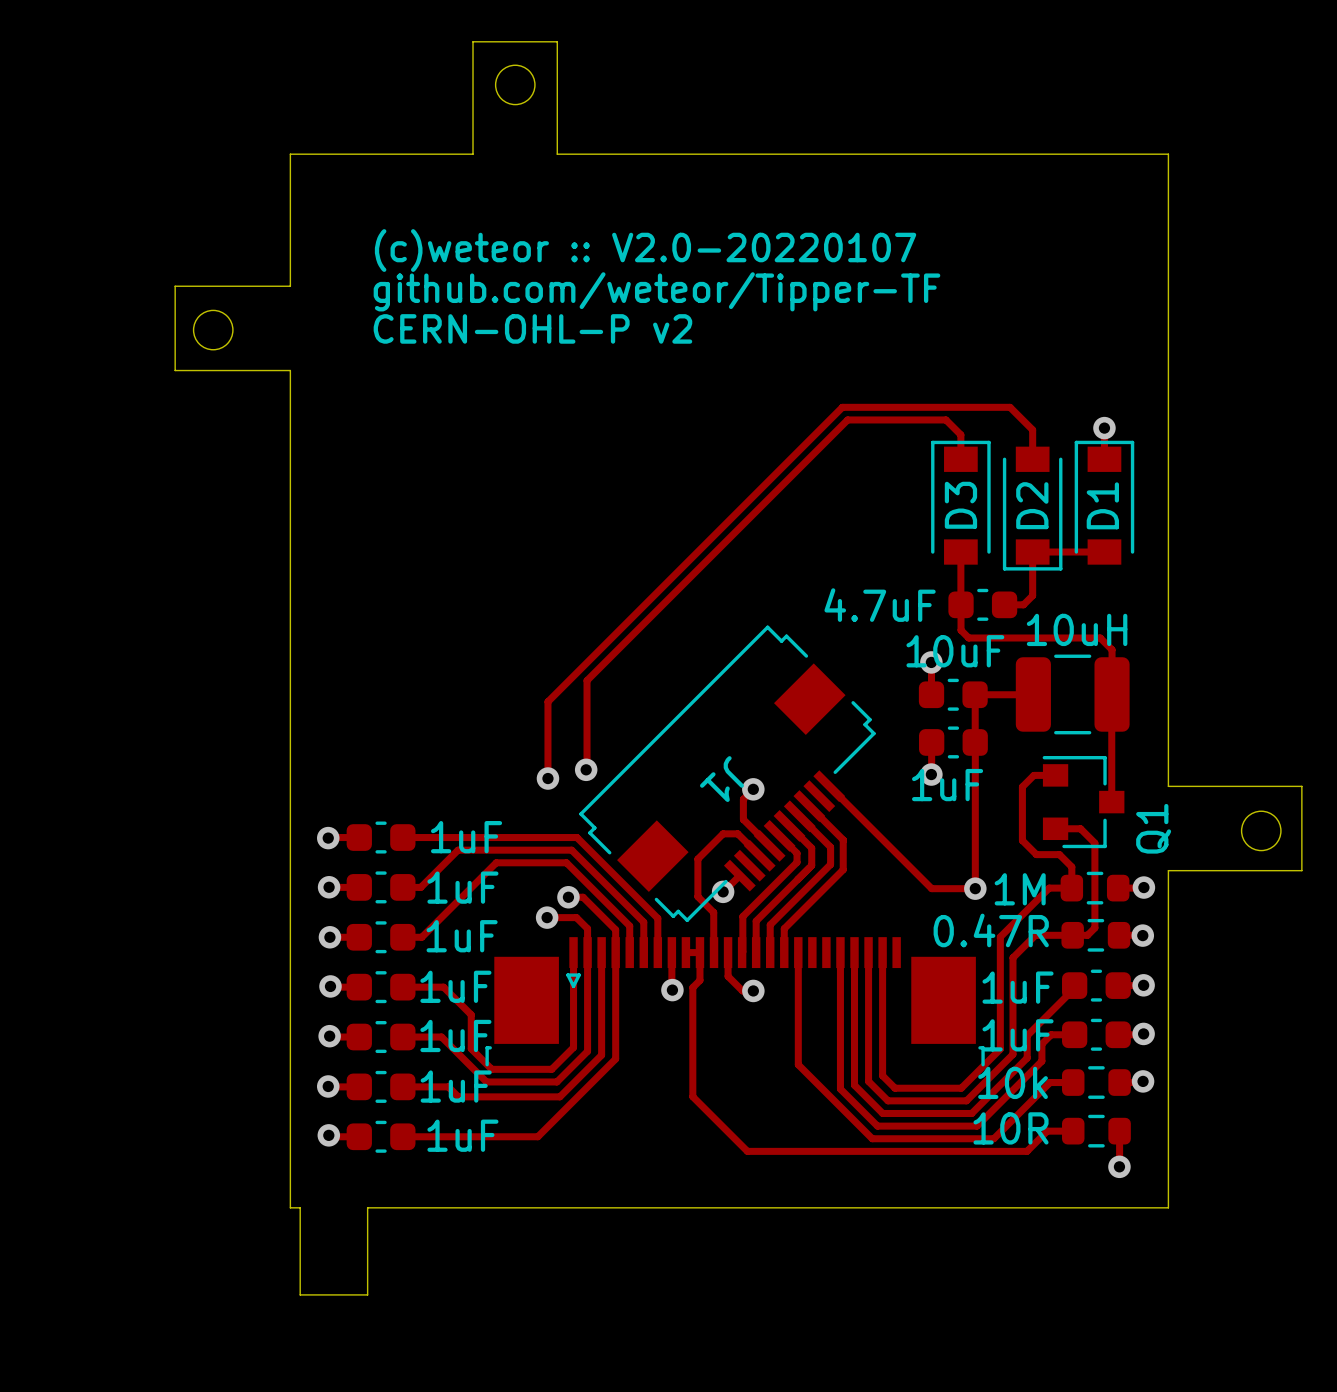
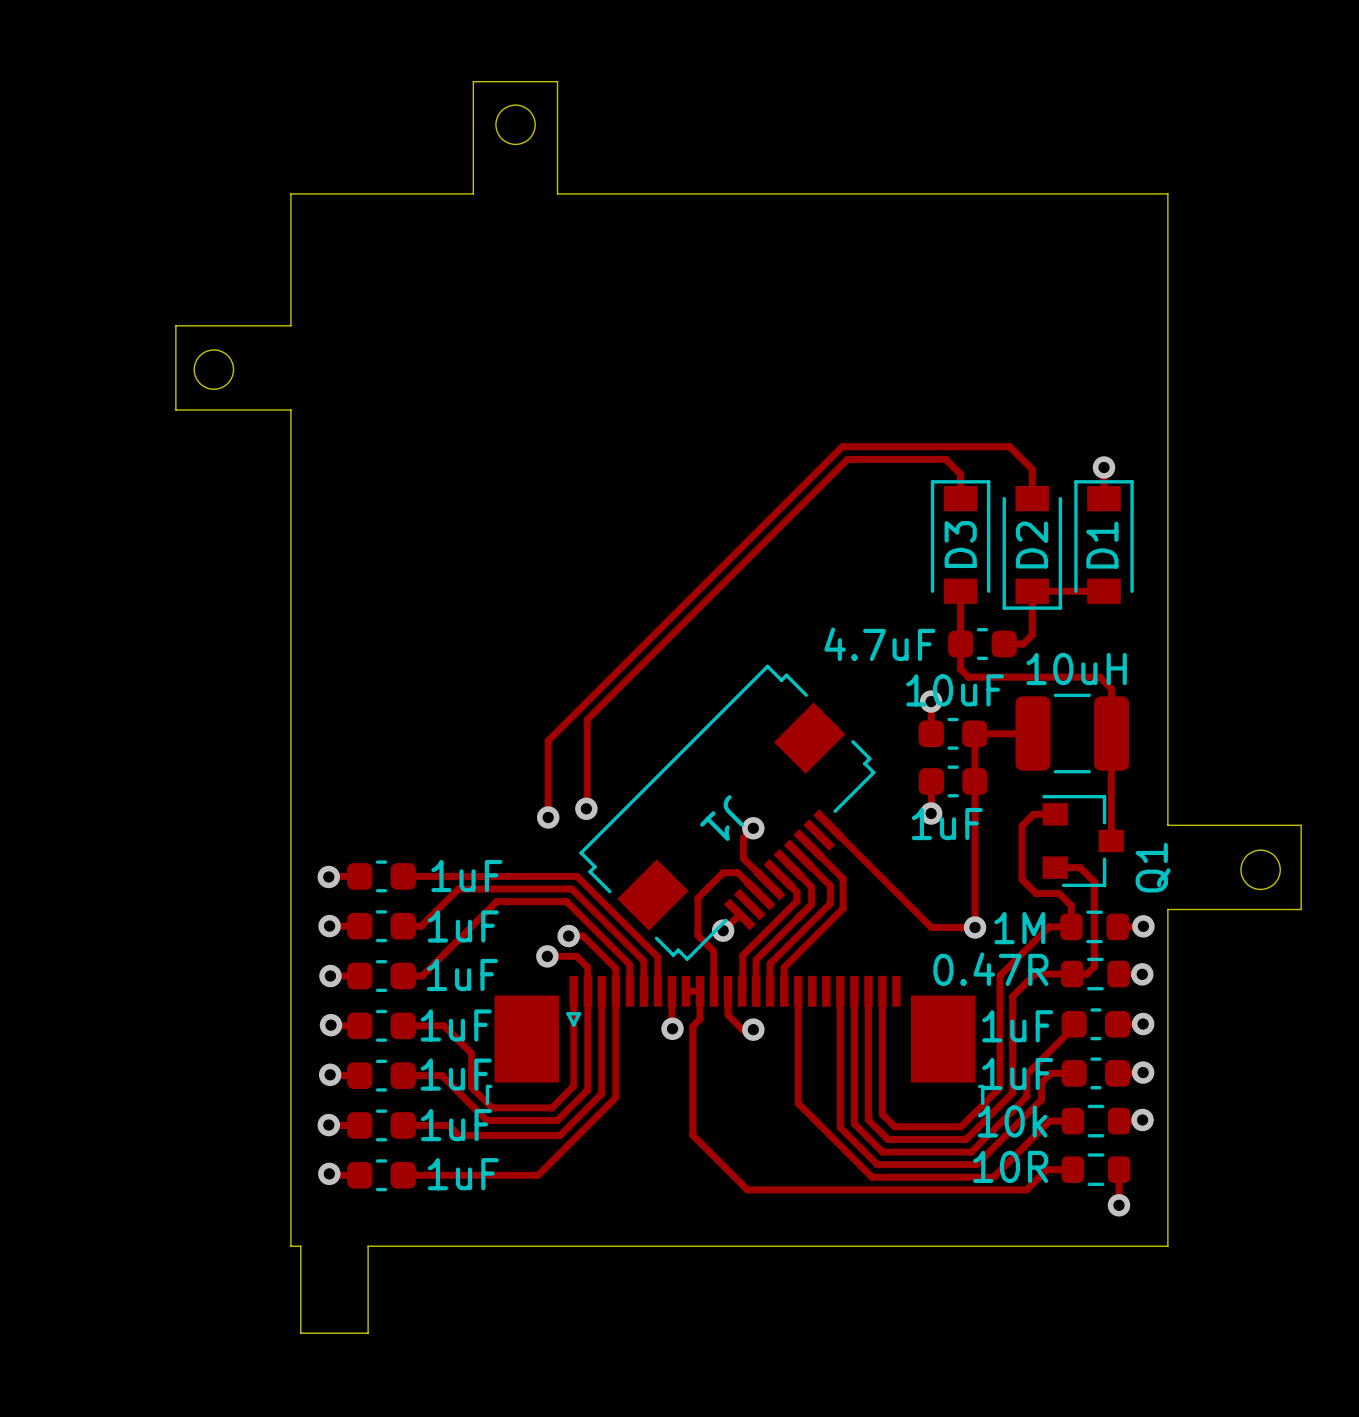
text: (c)weteor :: V2.0-20220107 (645, 250) -> none
text: github.com/weteor/Tipper-TF (656, 291) -> none
text: CERN-OHL-P v2 (532, 328) -> none

